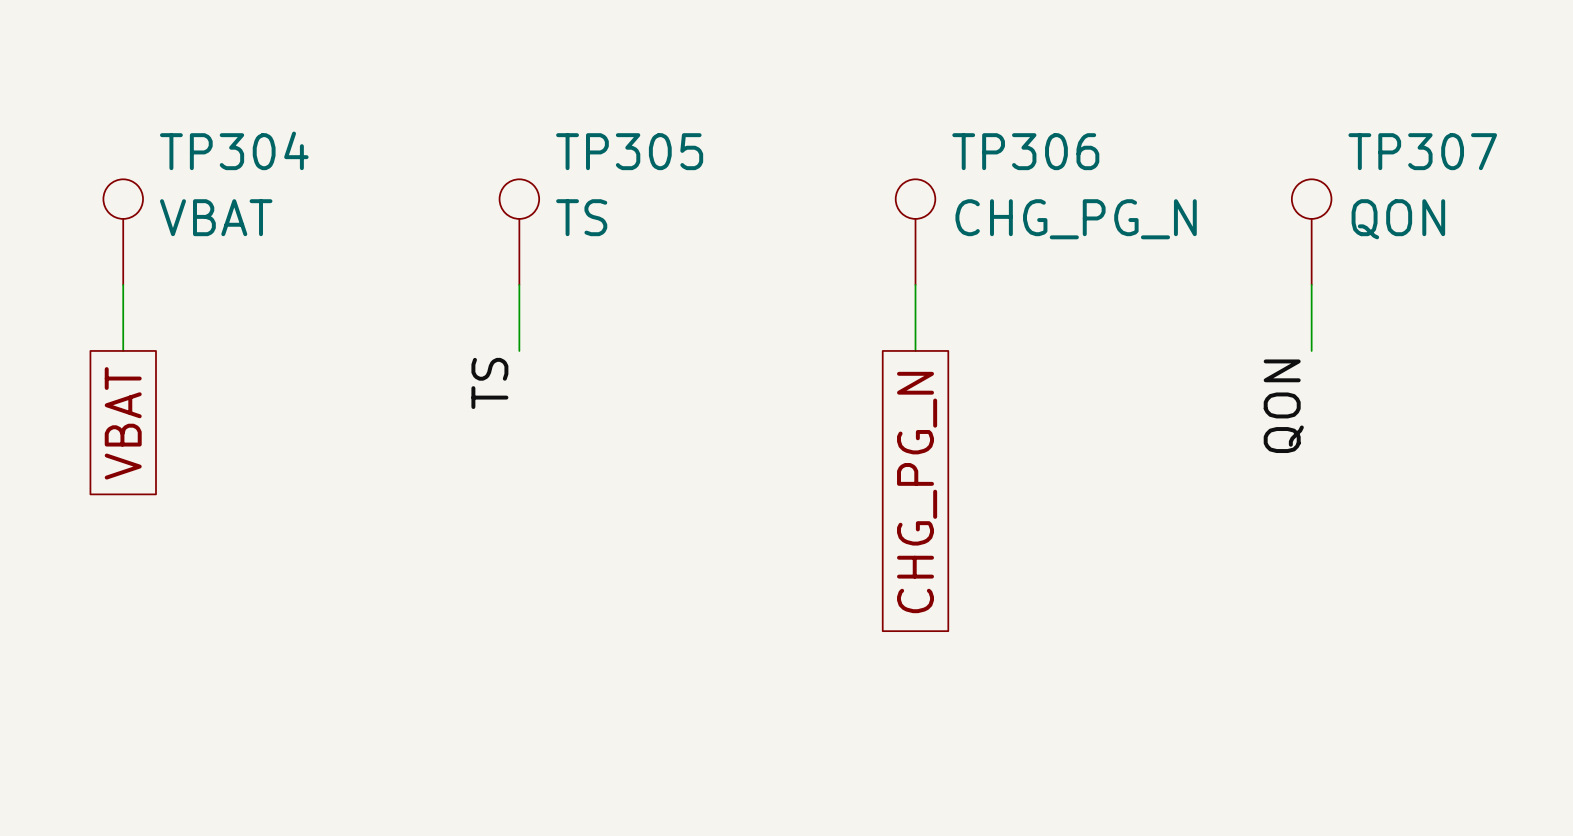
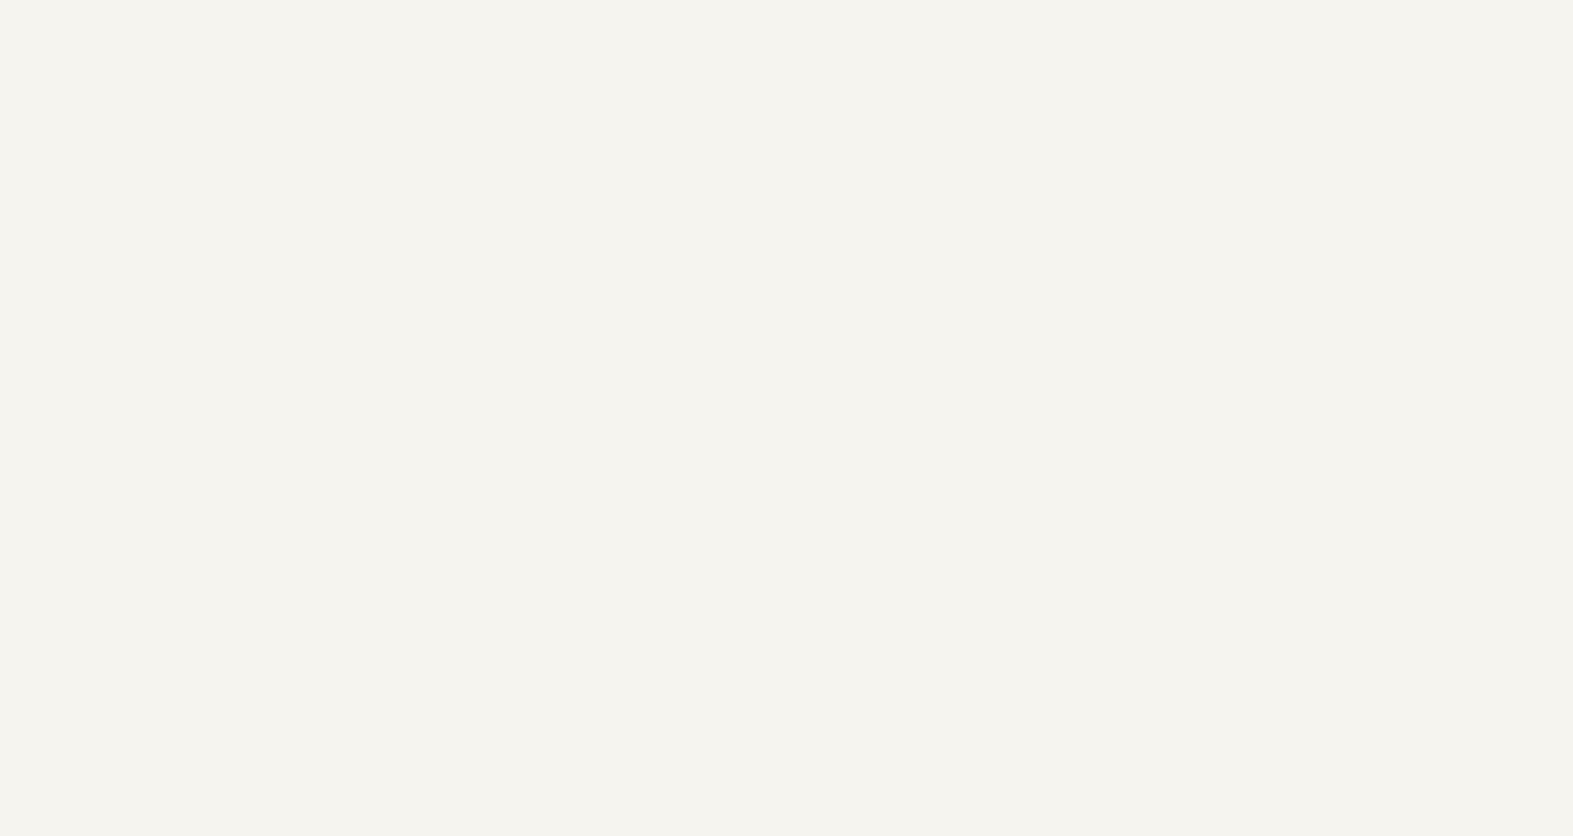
TP304: VBAT (123, 232) -> none
TP305: TS (519, 232) -> none
TP306: CHG_PG_N (915, 232) -> none
TP307: QON (1311, 232) -> none
wire: (123, 284) (123, 350) -> none
wire: (519, 284) (519, 350) -> none
wire: (915, 284) (915, 350) -> none
wire: (1311, 284) (1311, 350) -> none
label: TS (489, 383) -> none
label: QON (1283, 406) -> none
global label: VBAT (123, 423) -> none
global label: CHG_PG_N (917, 492) -> none

